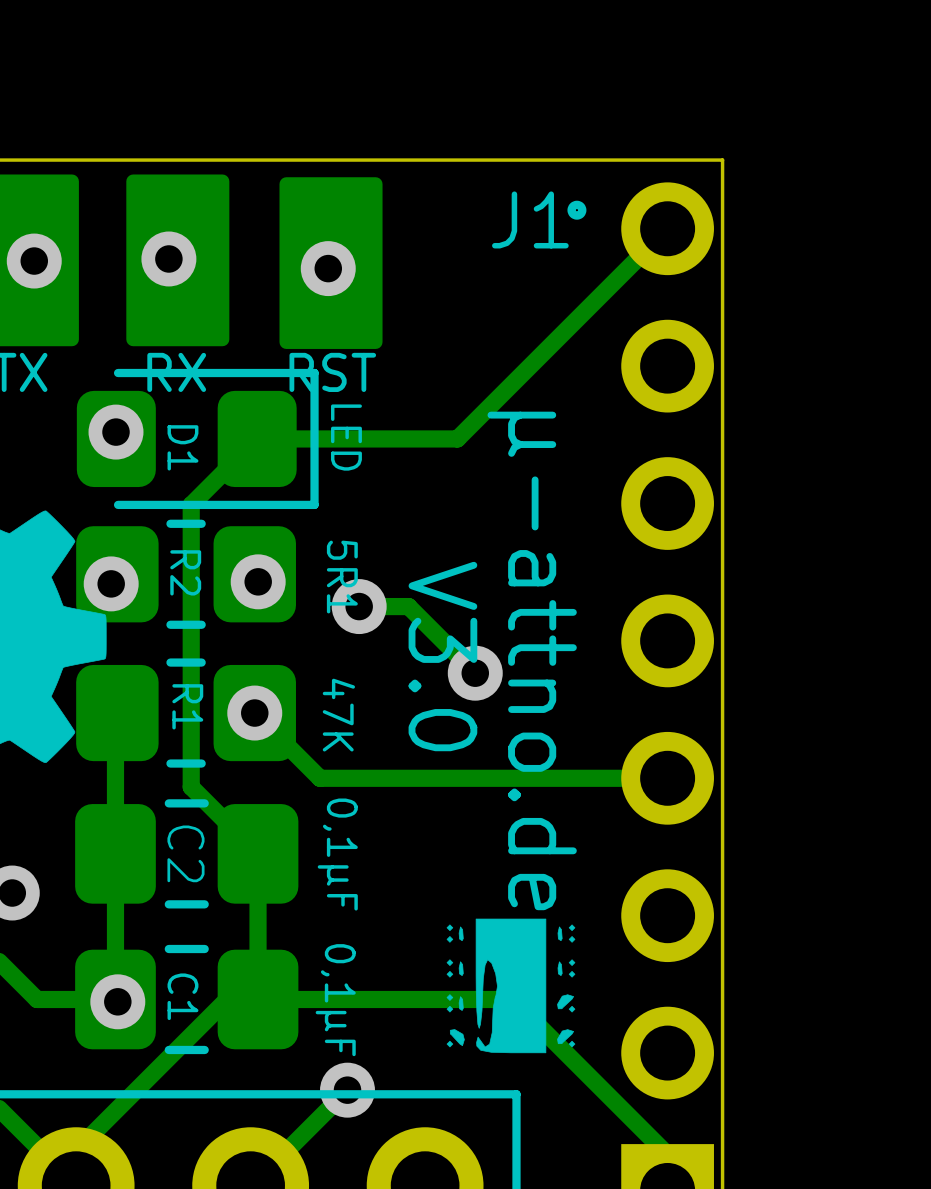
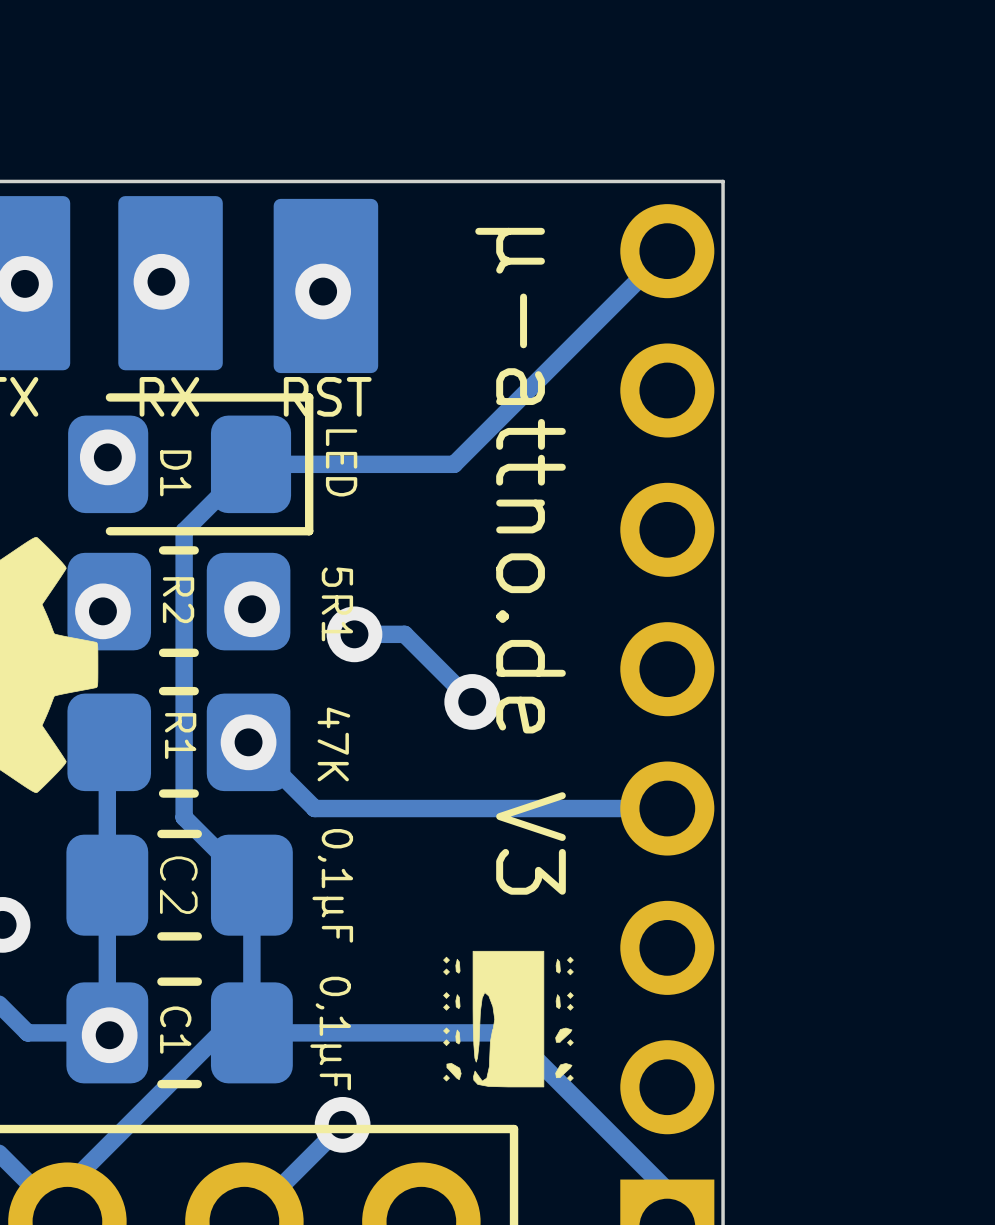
drawing: [567, 200, 587, 220] -> none
J1 name: J1 (530, 219) -> none
text: V3.0 (442, 656) -> none
text: µ-attno.de (532, 660) -> µ-attno.de V3 (520, 561)

